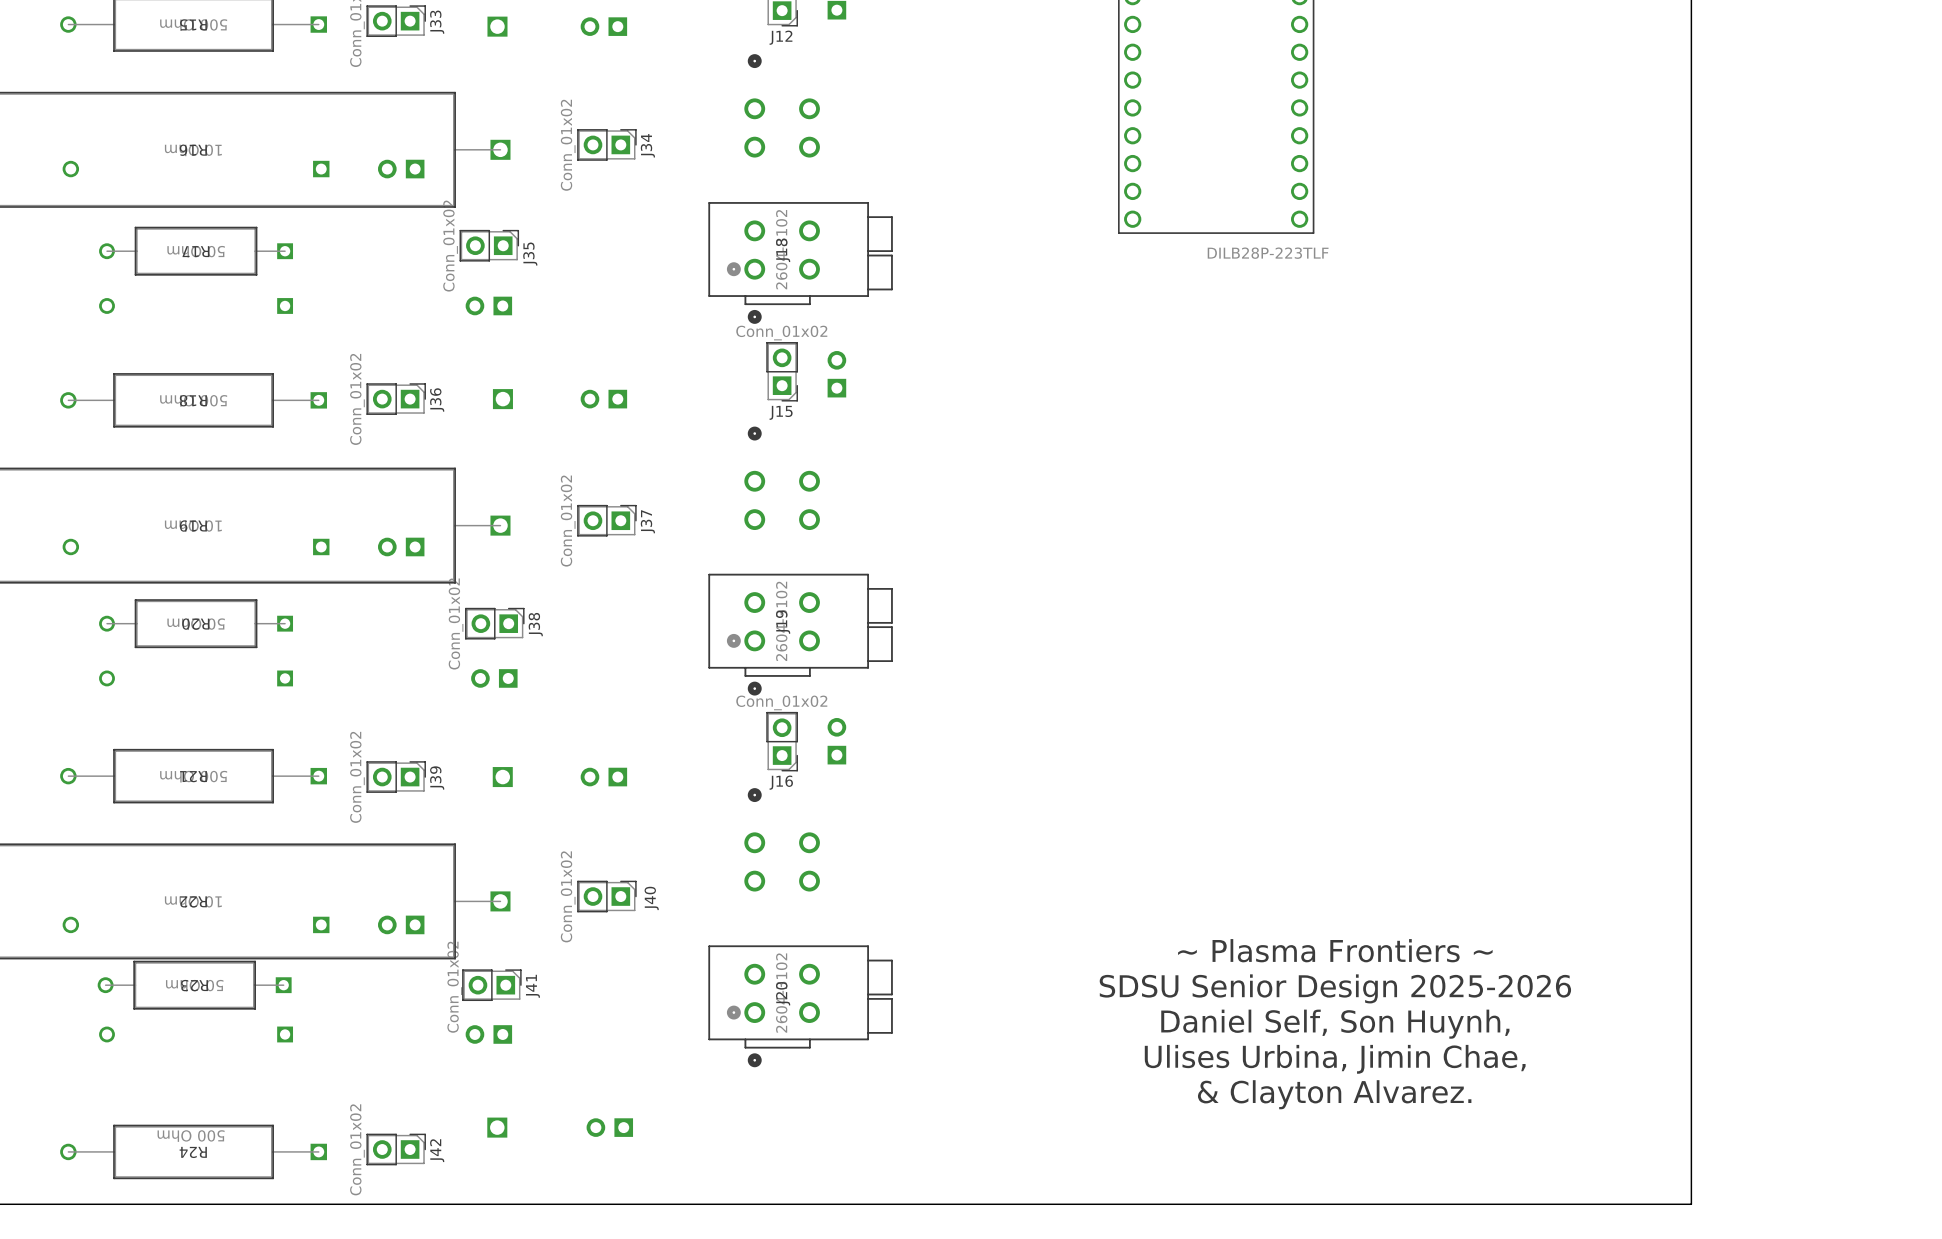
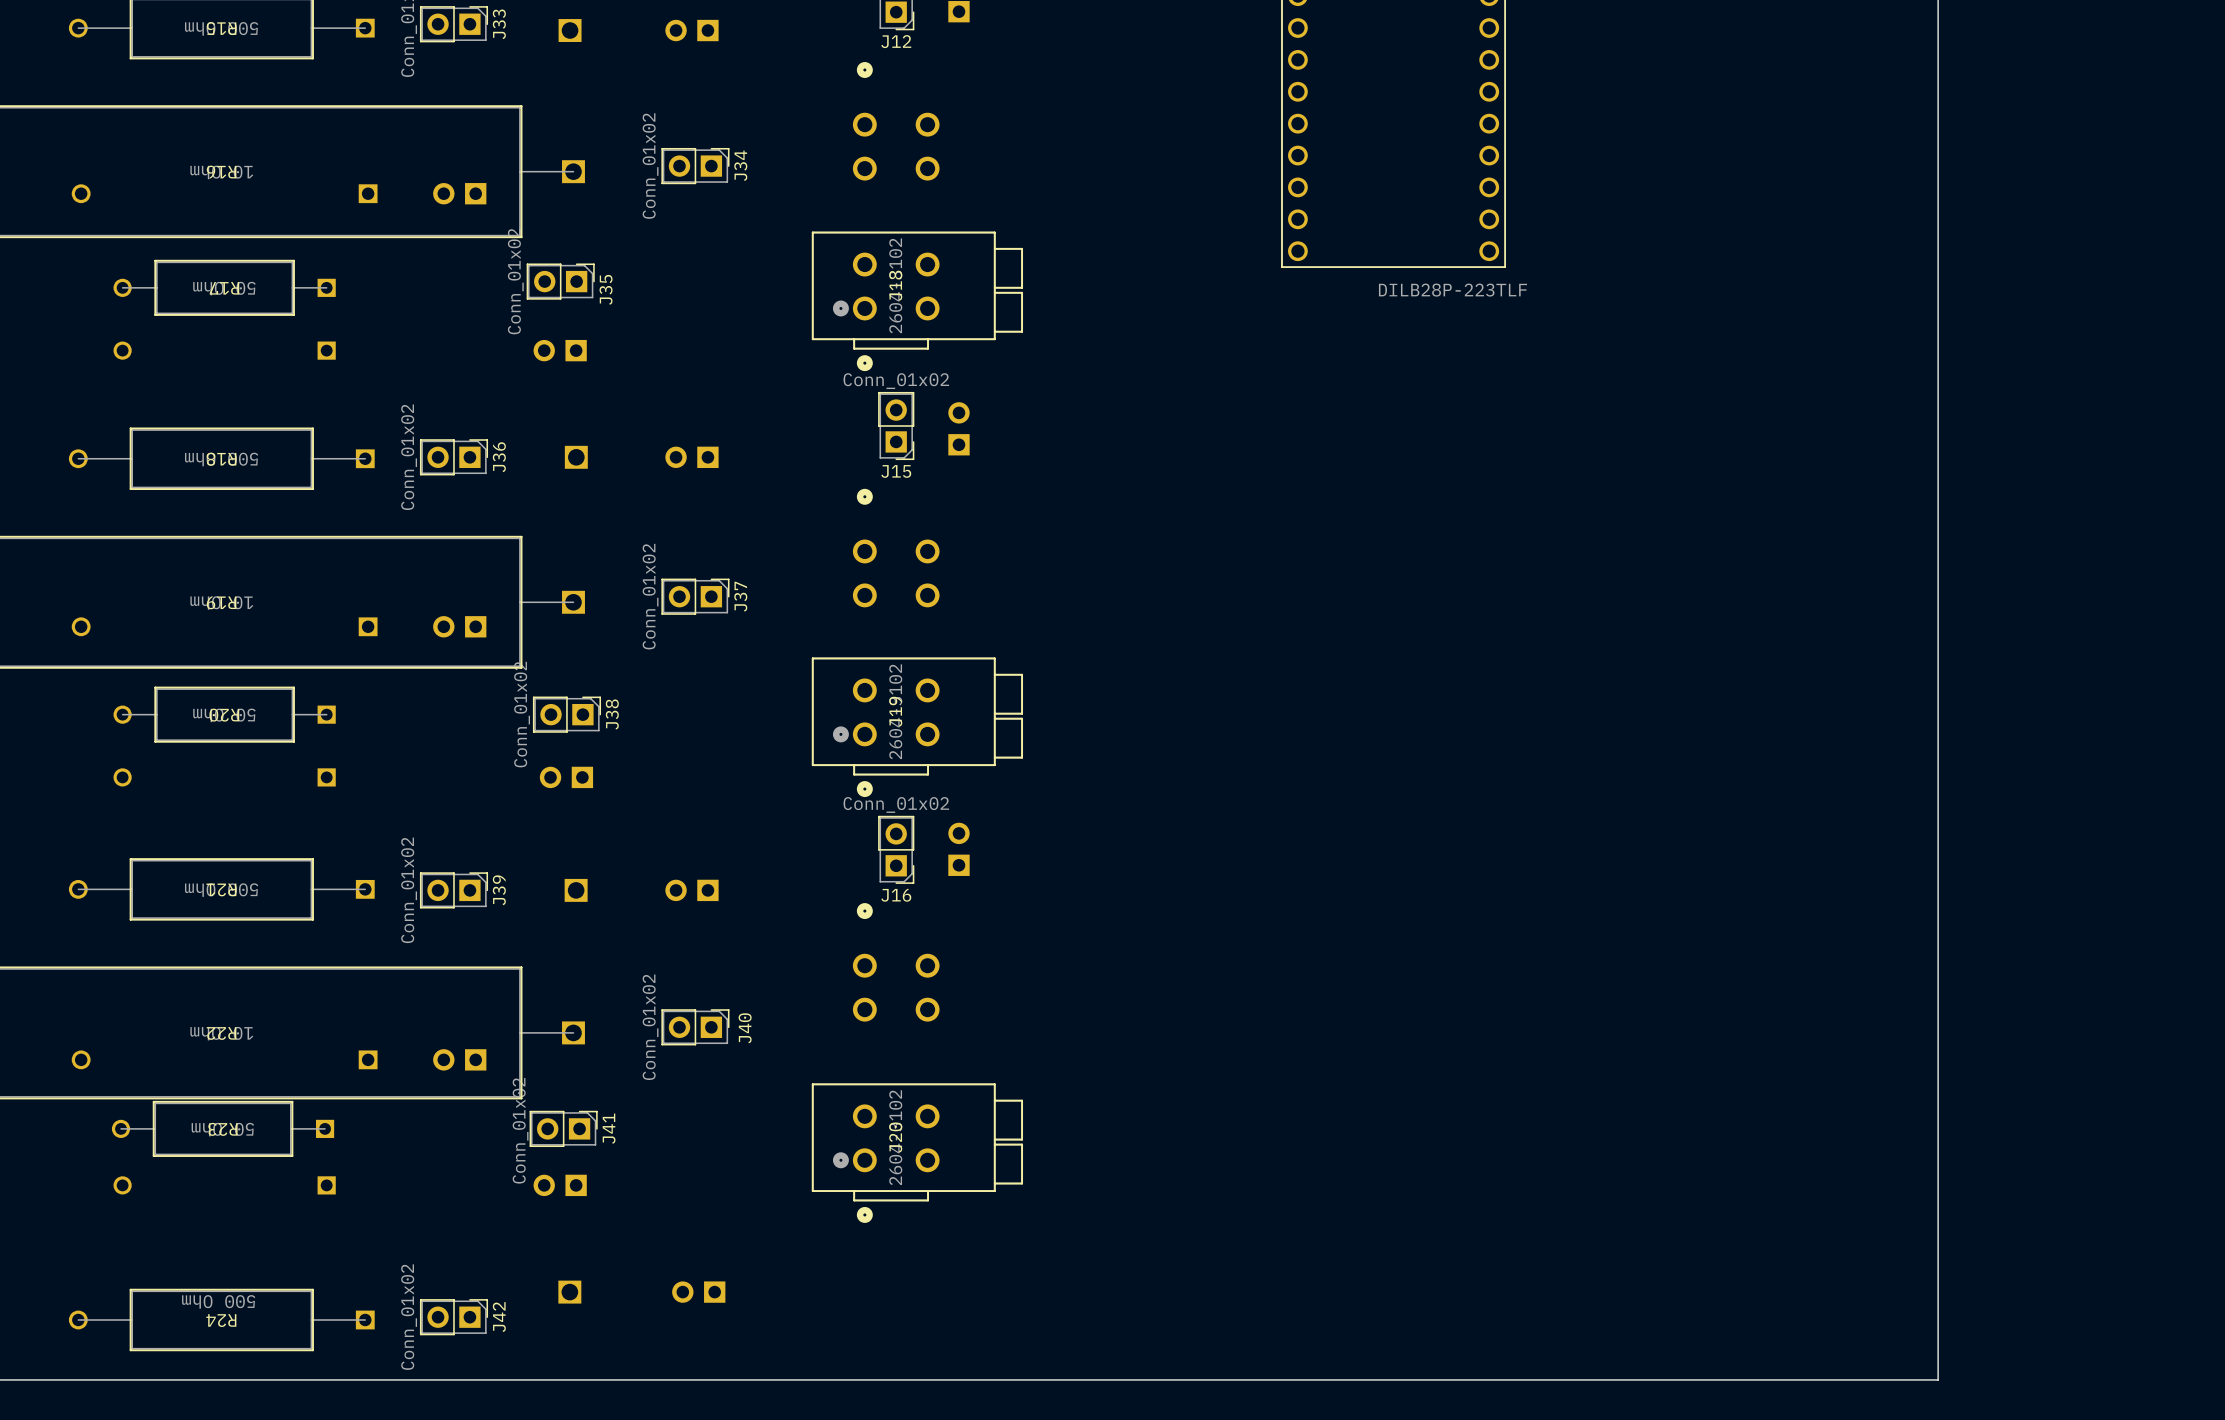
text: ~ Plasma Frontiers ~ (1335, 950) -> none
text: SDSU Senior Design 2025-2026 (1335, 988) -> none
text: Daniel Self, Son Huynh, (1335, 1024) -> none
text: Ulises Urbina, Jimin Chae, (1335, 1059) -> none
text: & Clayton Alvarez. (1334, 1094) -> none

